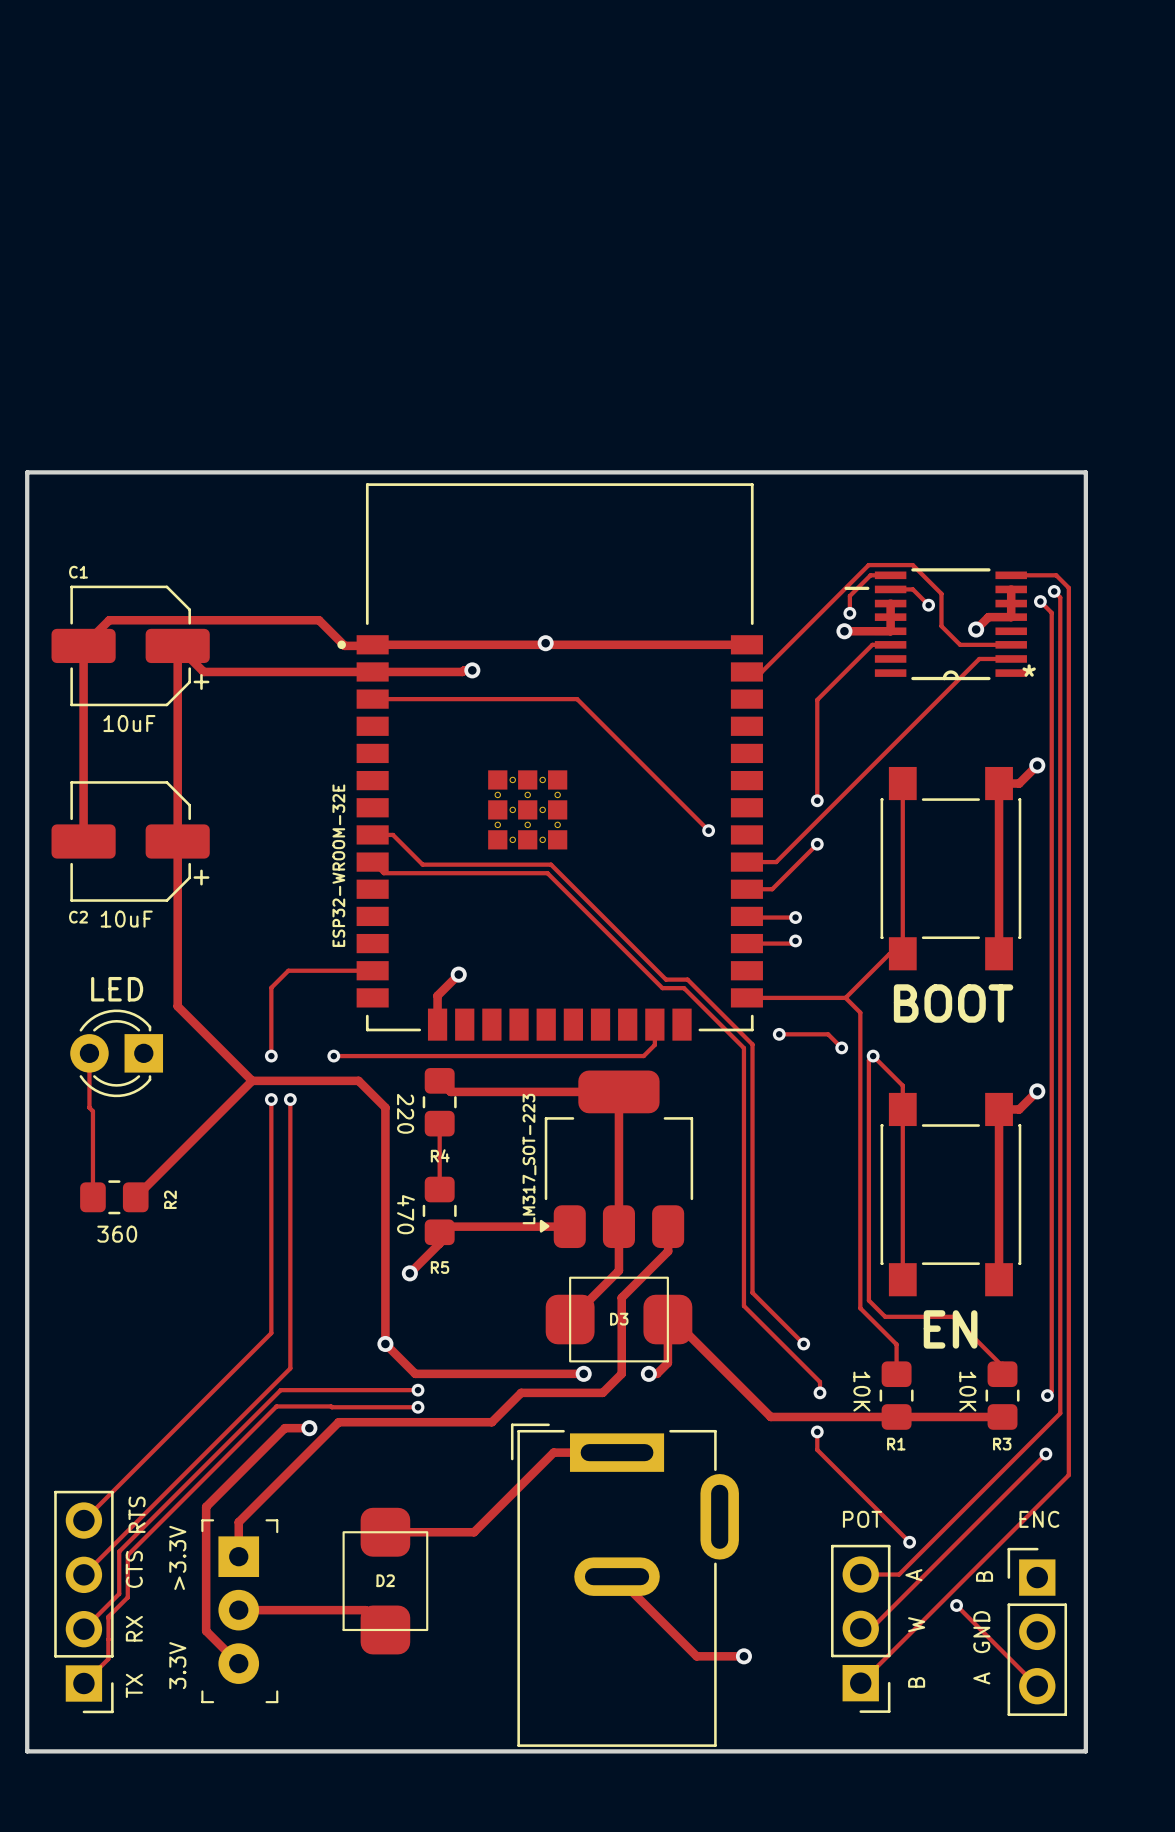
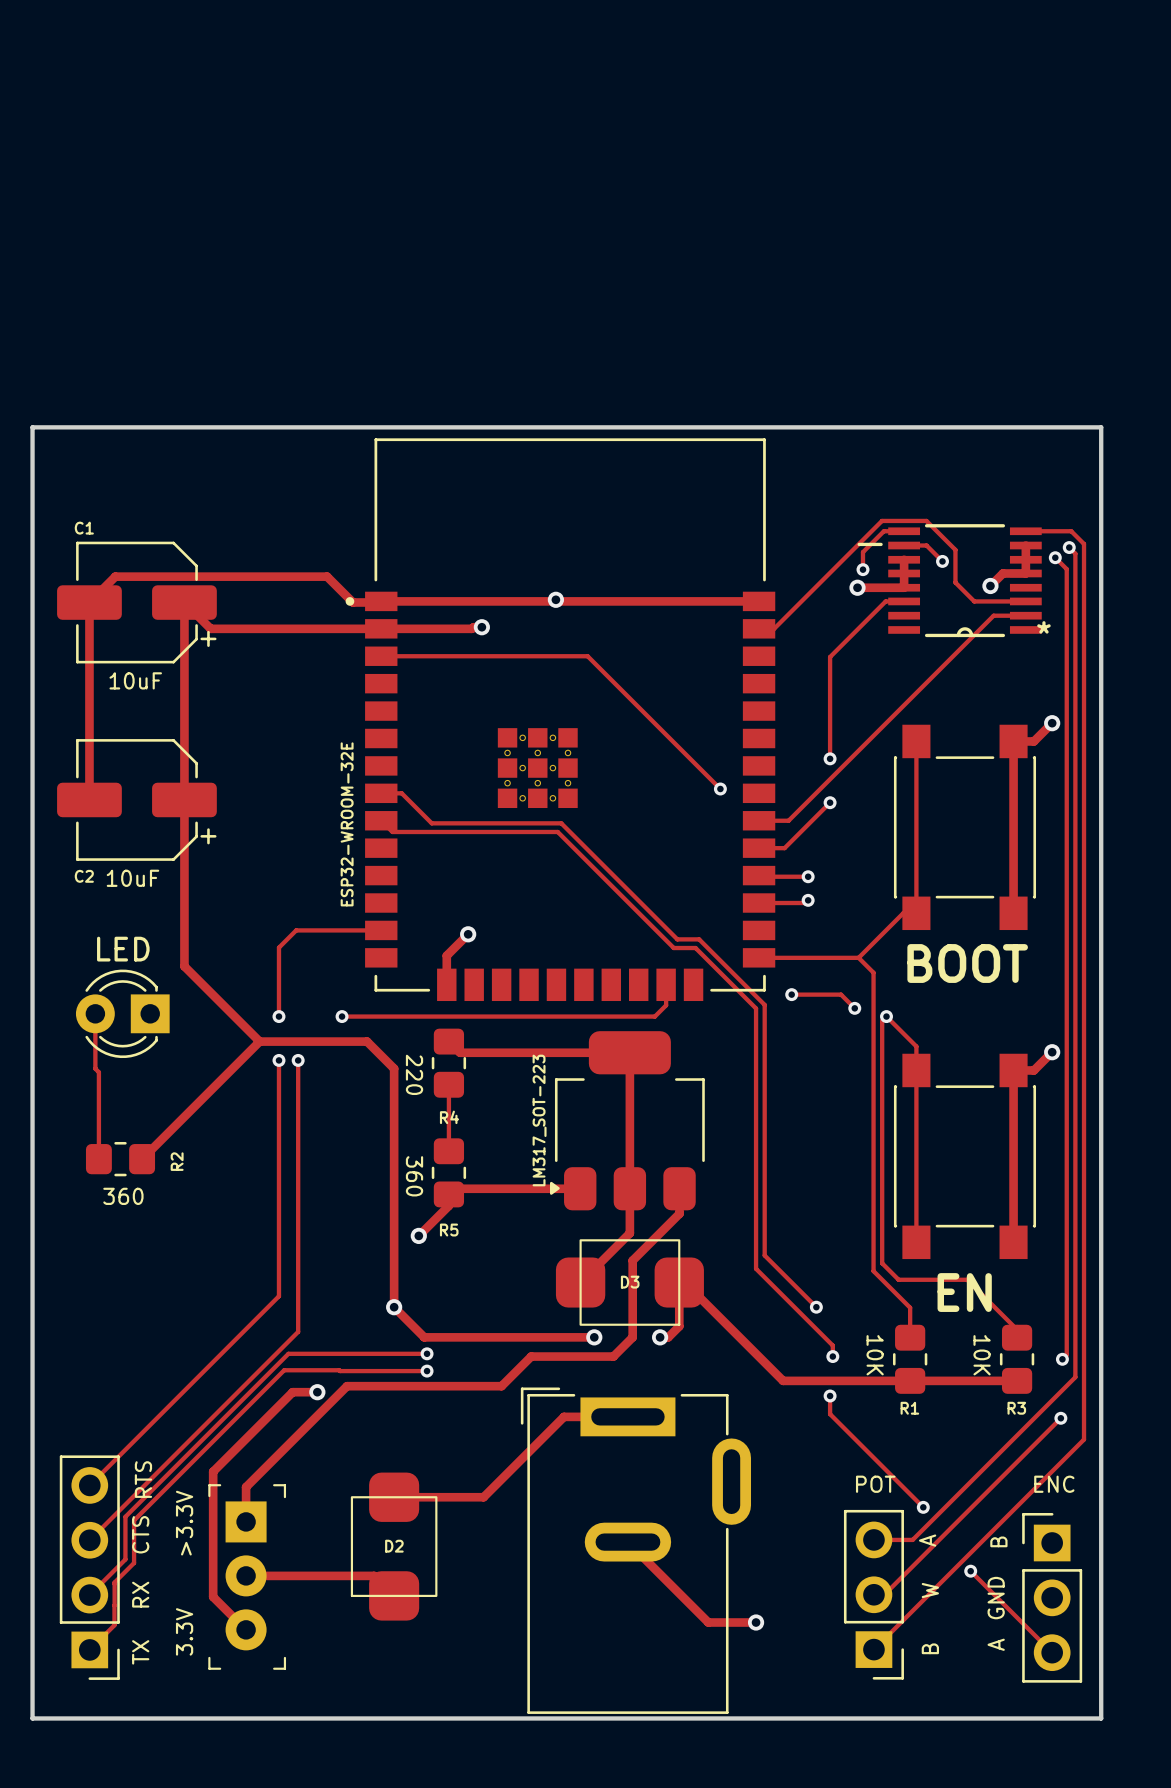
text: 470 (405, 1214) -> 360 (414, 1176)

